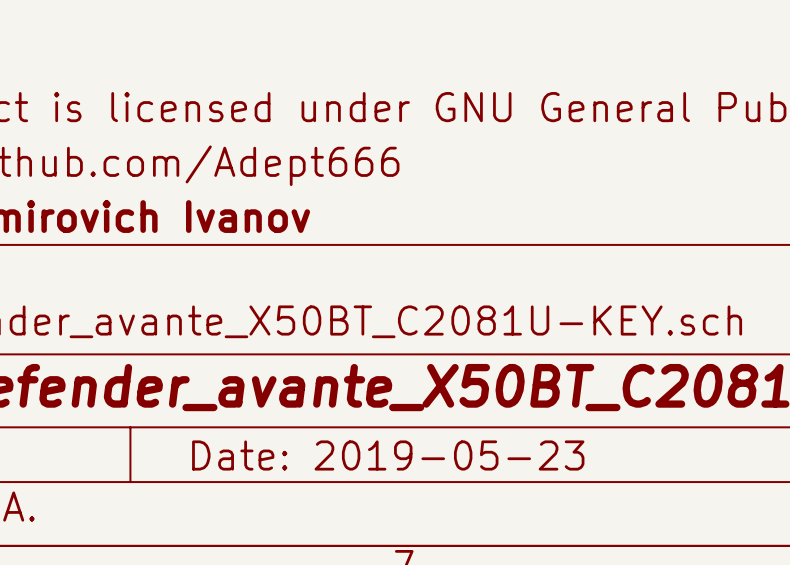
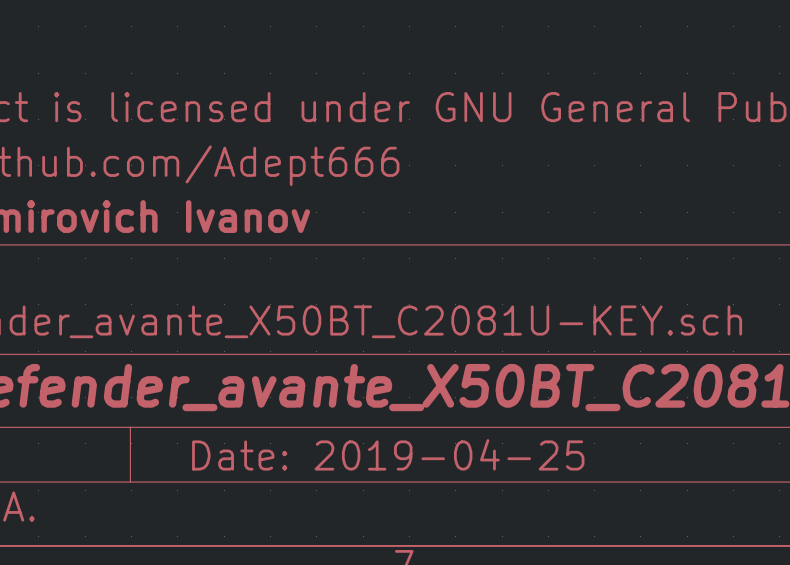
title block: Date: 2019-05-23 (388, 455) -> Date: 2019-04-25 (388, 454)

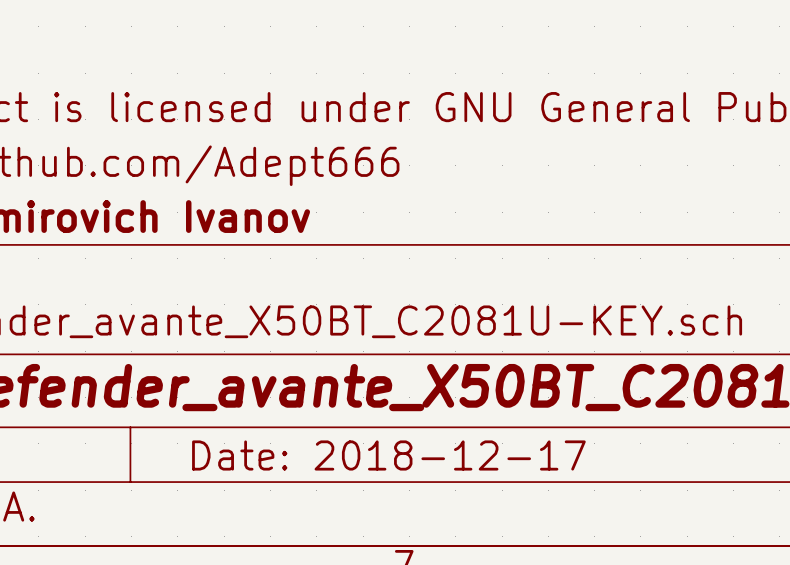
title block: Date: 2019-04-25 (388, 454) -> Date: 2018-12-17 (388, 455)

